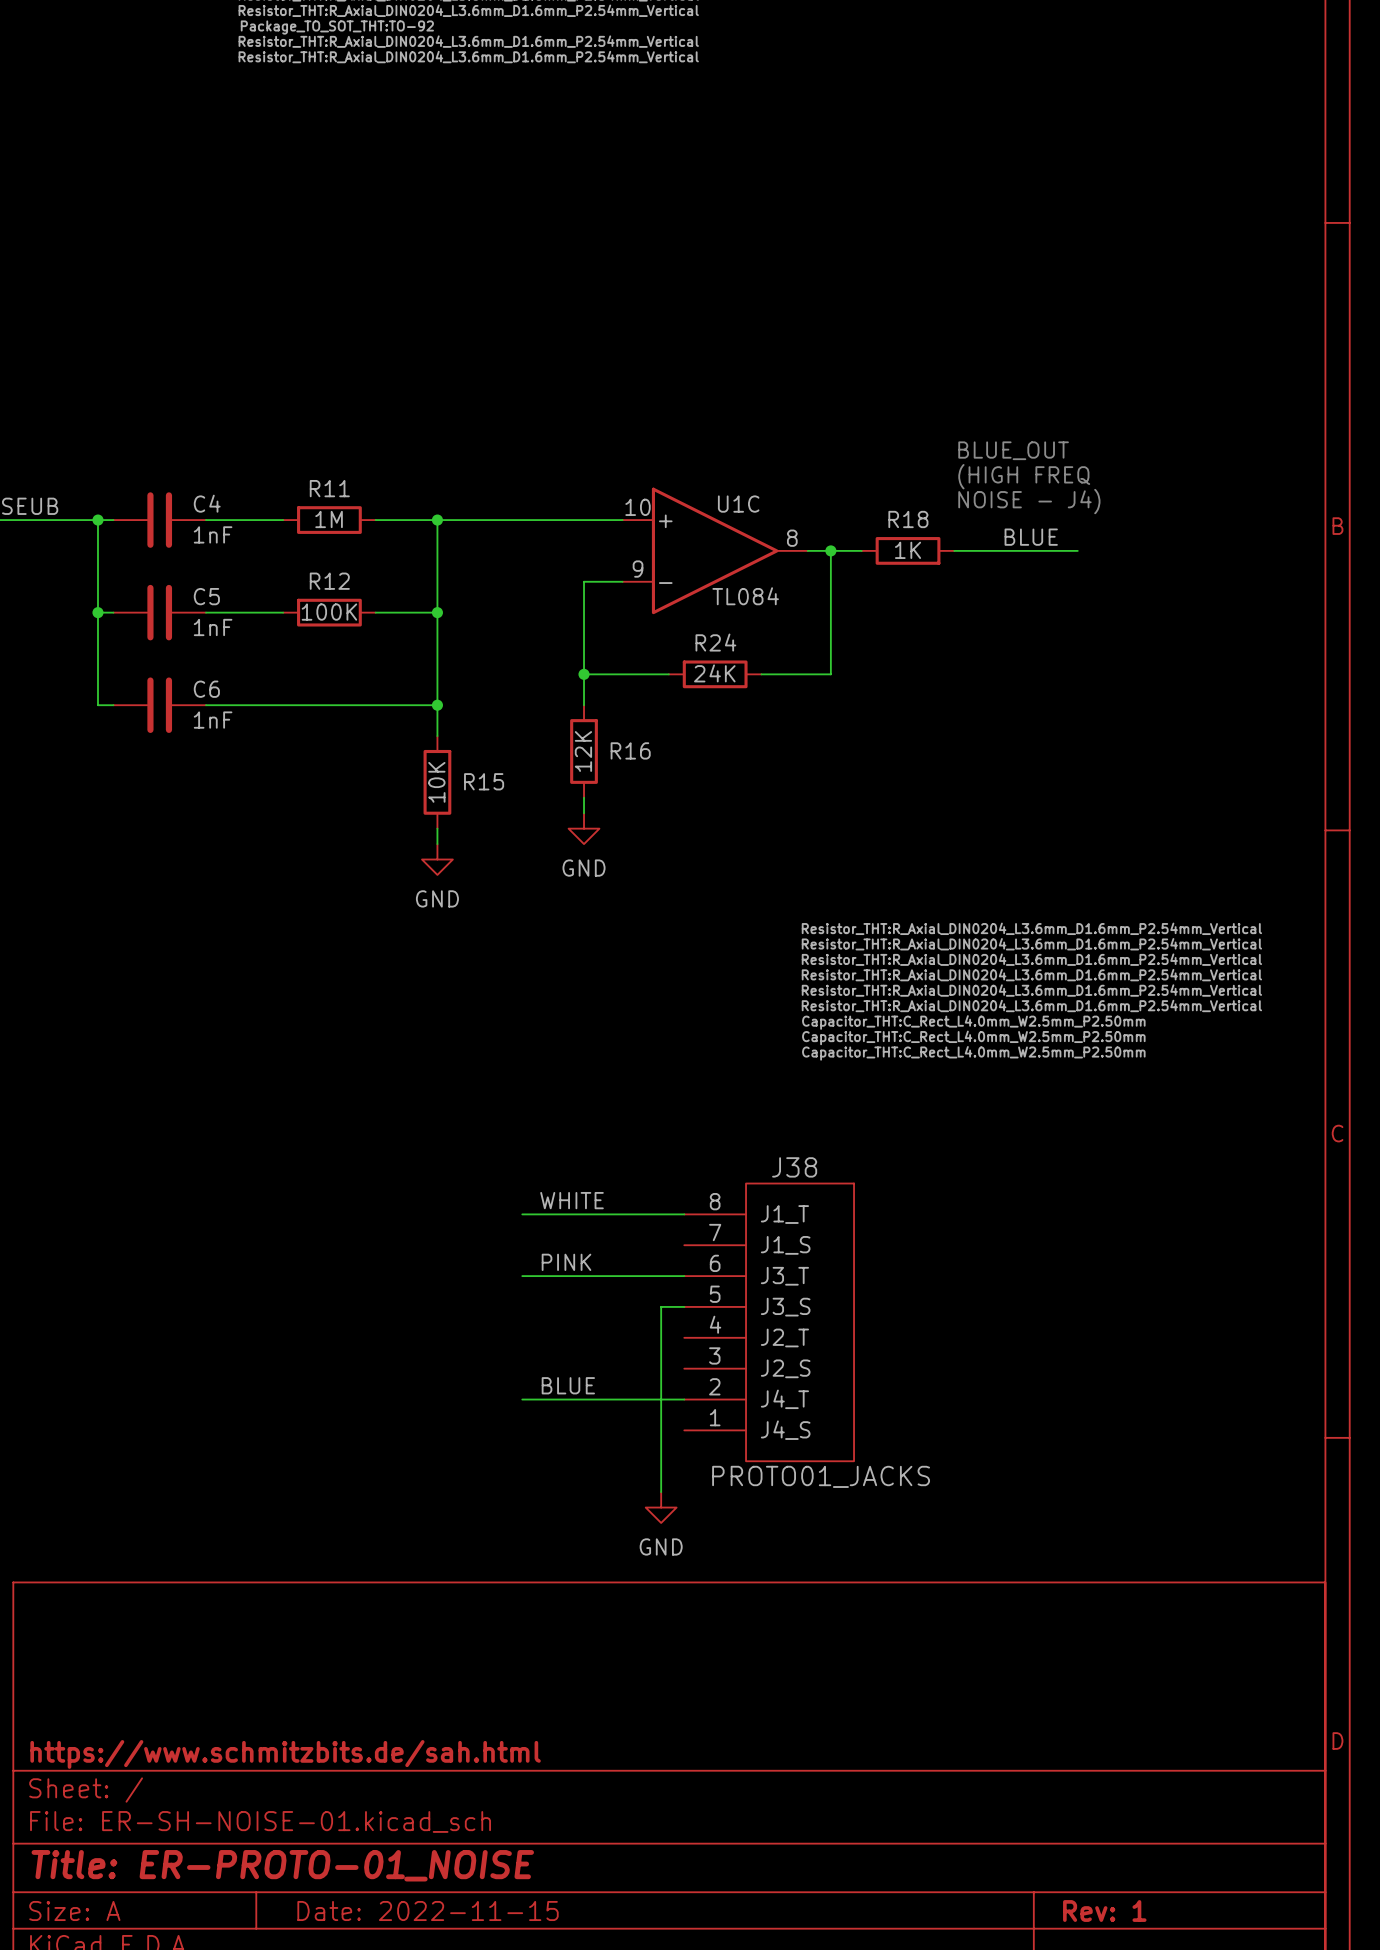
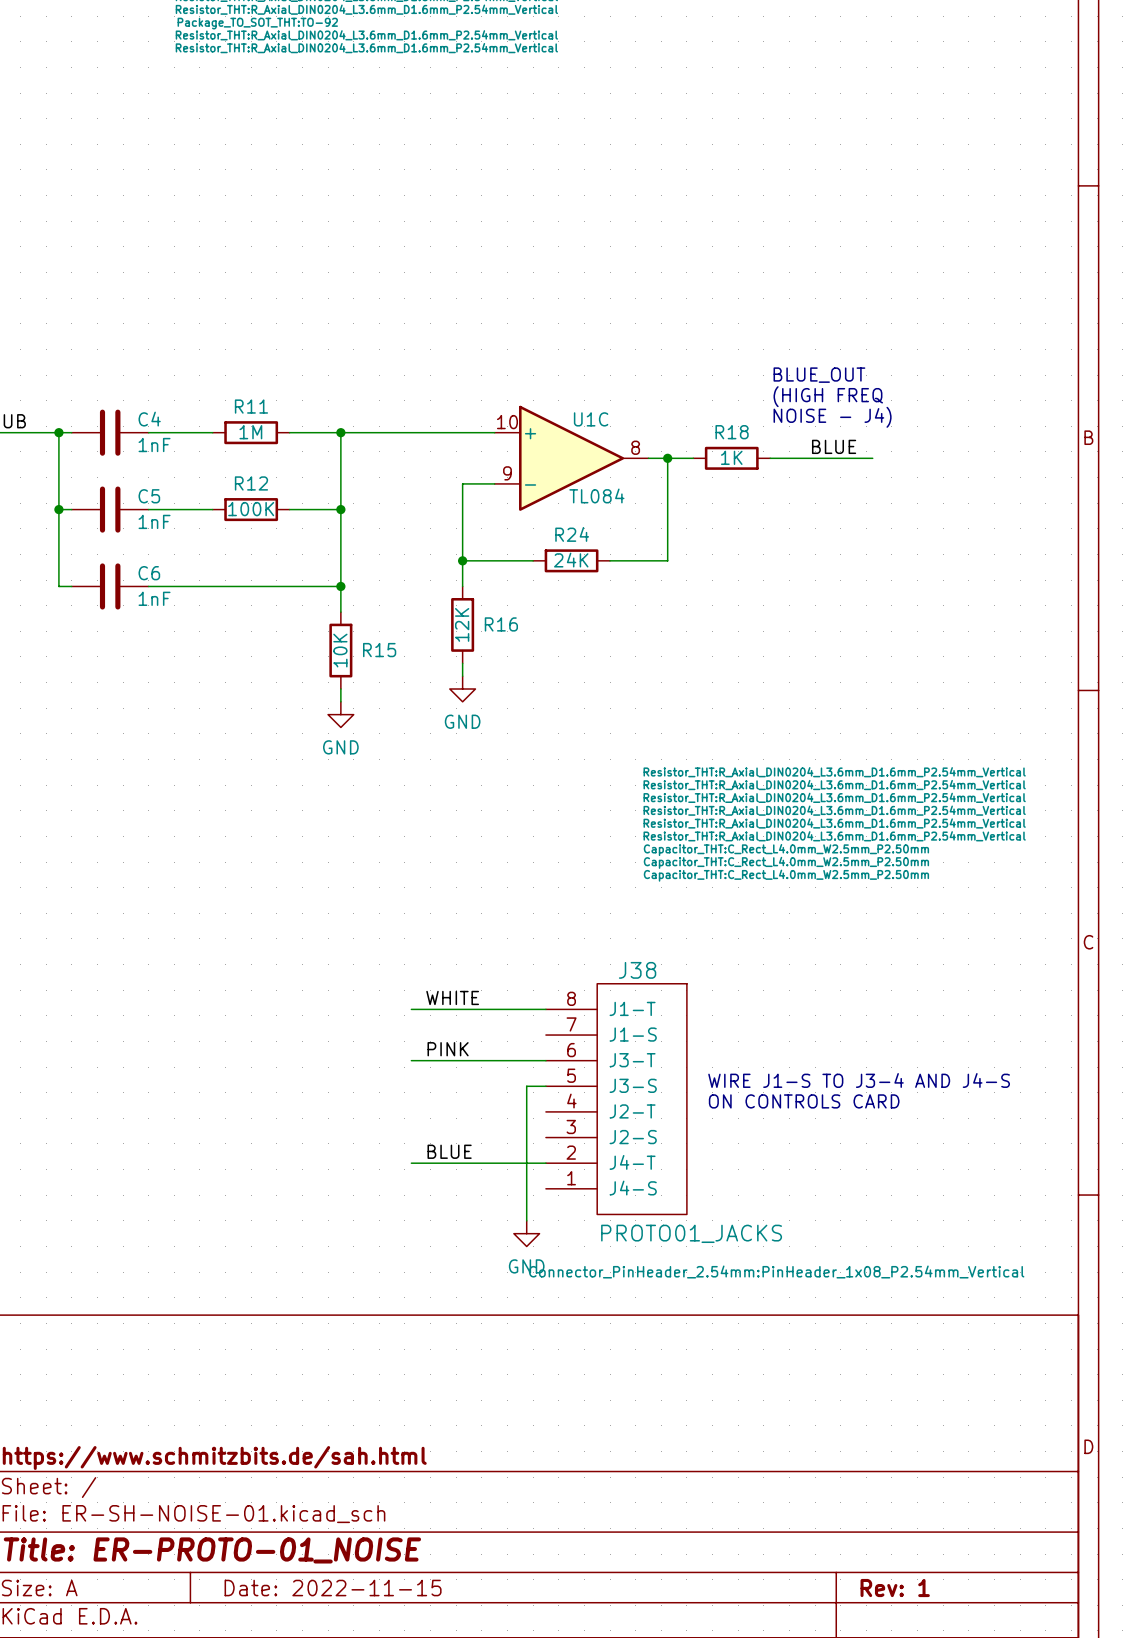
J38 pin name: J1_T (784, 1214) -> J1-T (632, 1008)
J38 pin name: J1_S (785, 1245) -> J1-S (633, 1034)
J38 pin name: J3_T (784, 1276) -> J3-T (632, 1060)
text: none -> WIRE J1-S TO J3-4 AND J4-S (859, 1080)
J38 pin name: J3_S (785, 1307) -> J3-S (633, 1085)
text: none -> ON CONTROLS CARD (804, 1101)
J38 pin name: J2_T (784, 1337) -> J2-T (632, 1111)
J38 pin name: J2_S (785, 1368) -> J2-S (633, 1137)
J38 pin name: J4_T (784, 1399) -> J4-T (632, 1162)
J38 pin name: J4_S (785, 1430) -> J4-S (633, 1188)
J38 value position: PROTO01_JACKS (821, 1476) -> PROTO01_JACKS (691, 1233)
power symbol position: GND (661, 1507) -> GND (526, 1233)
J38 text: none -> Connector_PinHeader_2.54mm:PinHeader_1x08_P2.54mm_Vertical (776, 1271)

